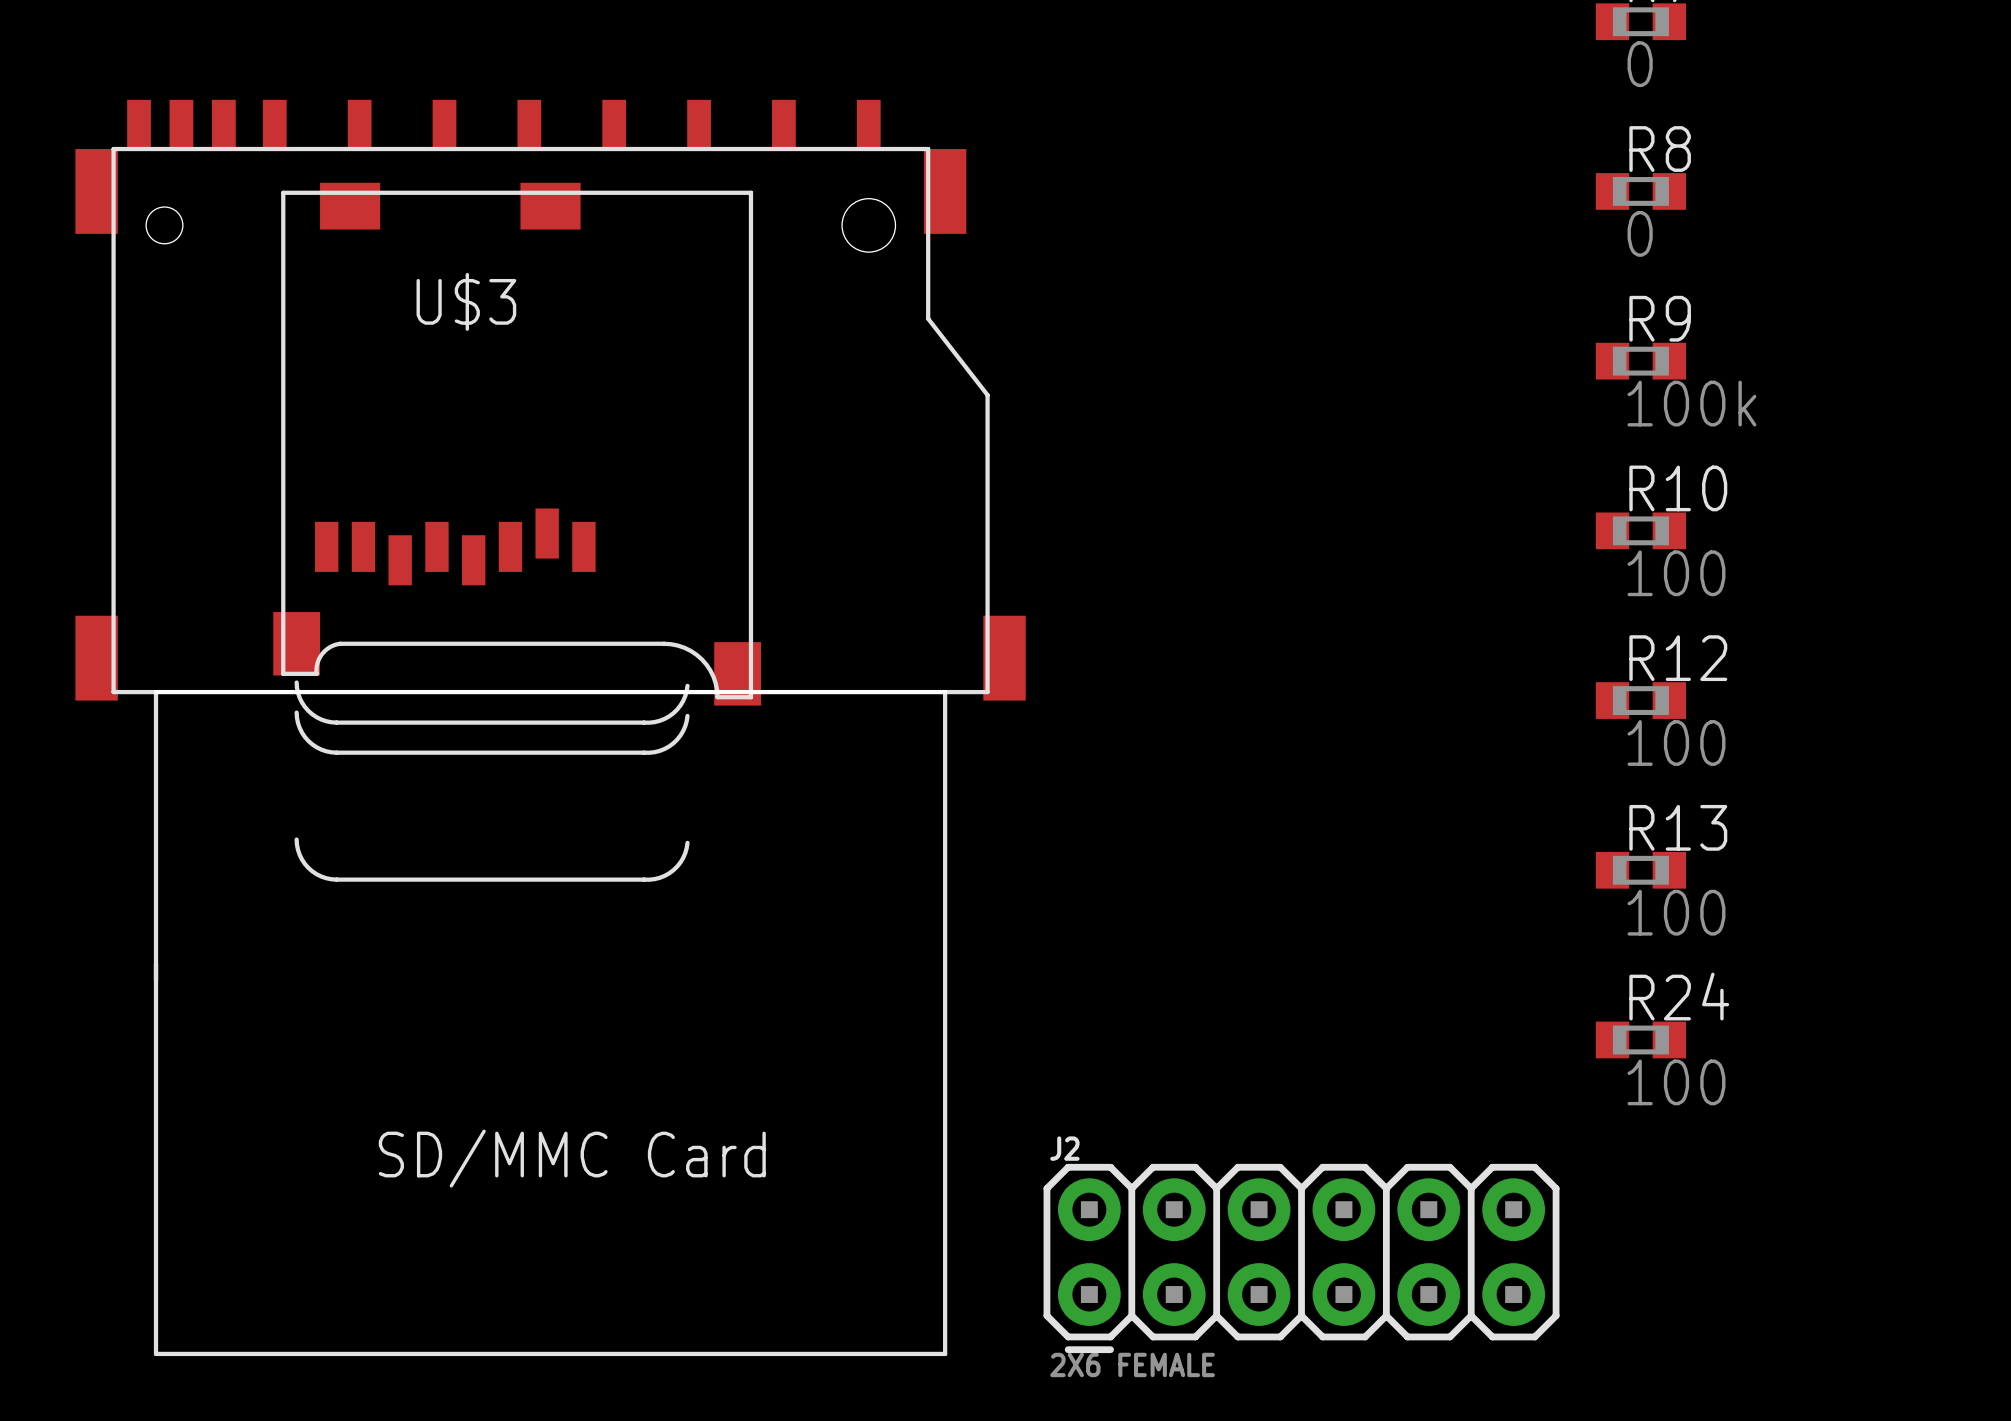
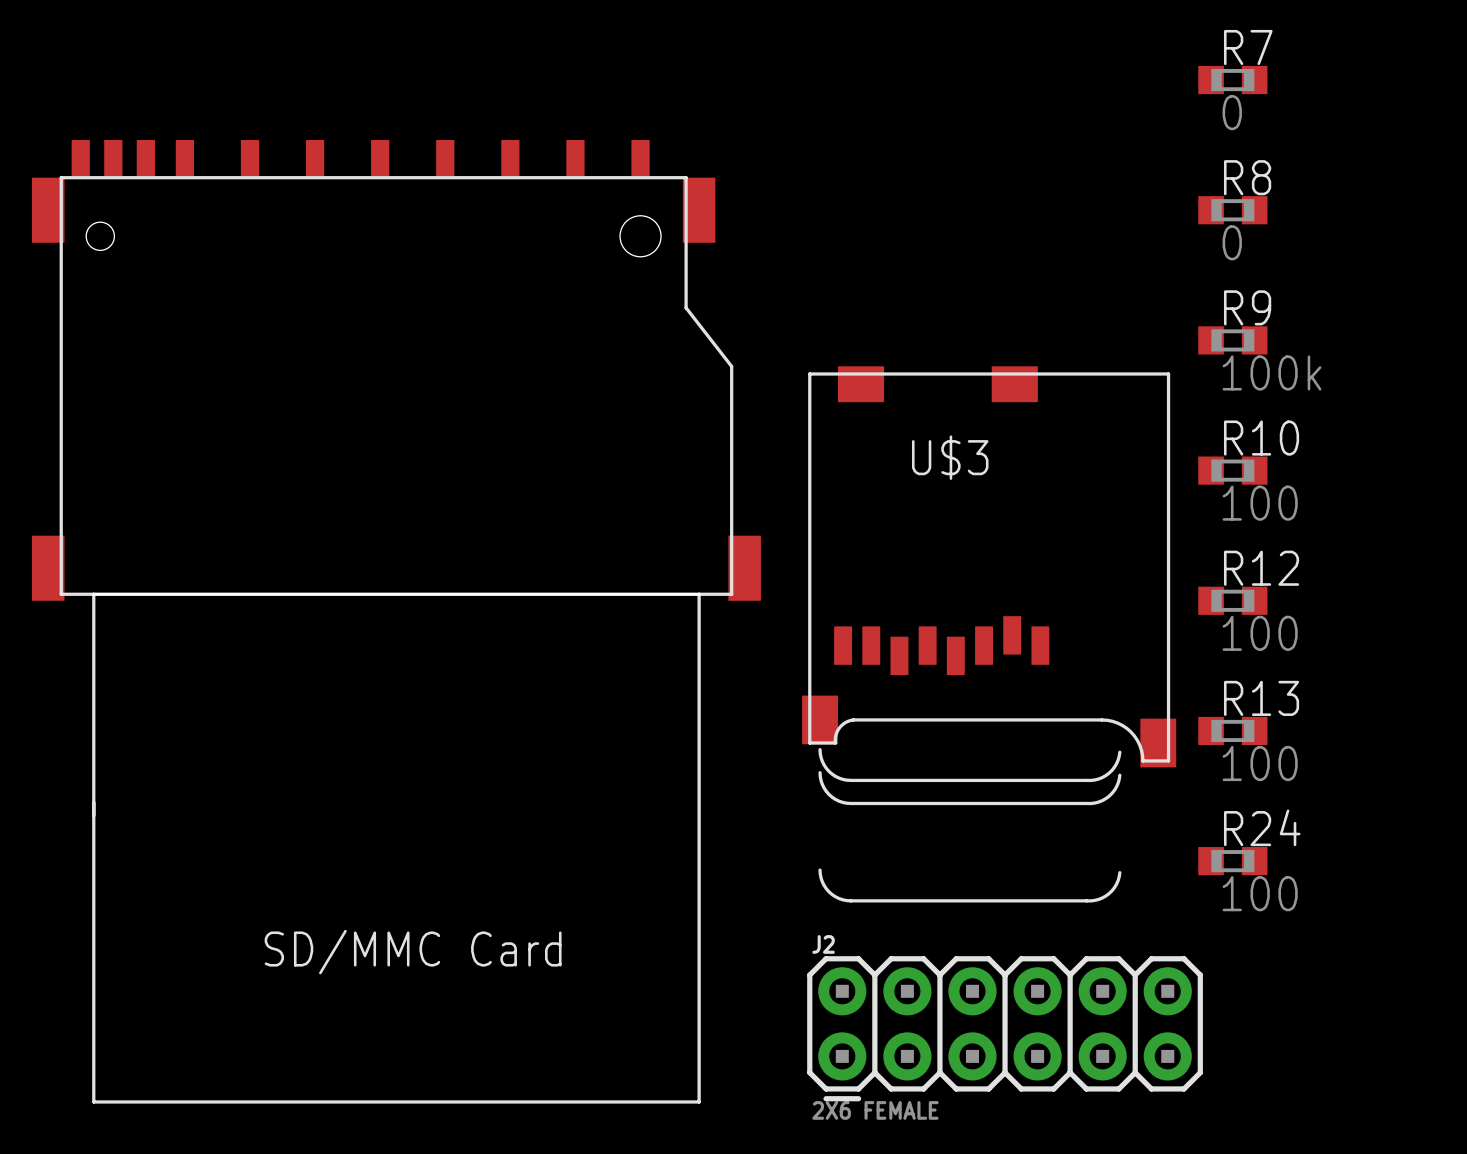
U$3 position: (517, 532) -> (989, 634)
J2 position: (1301, 1258) -> (1005, 1028)

